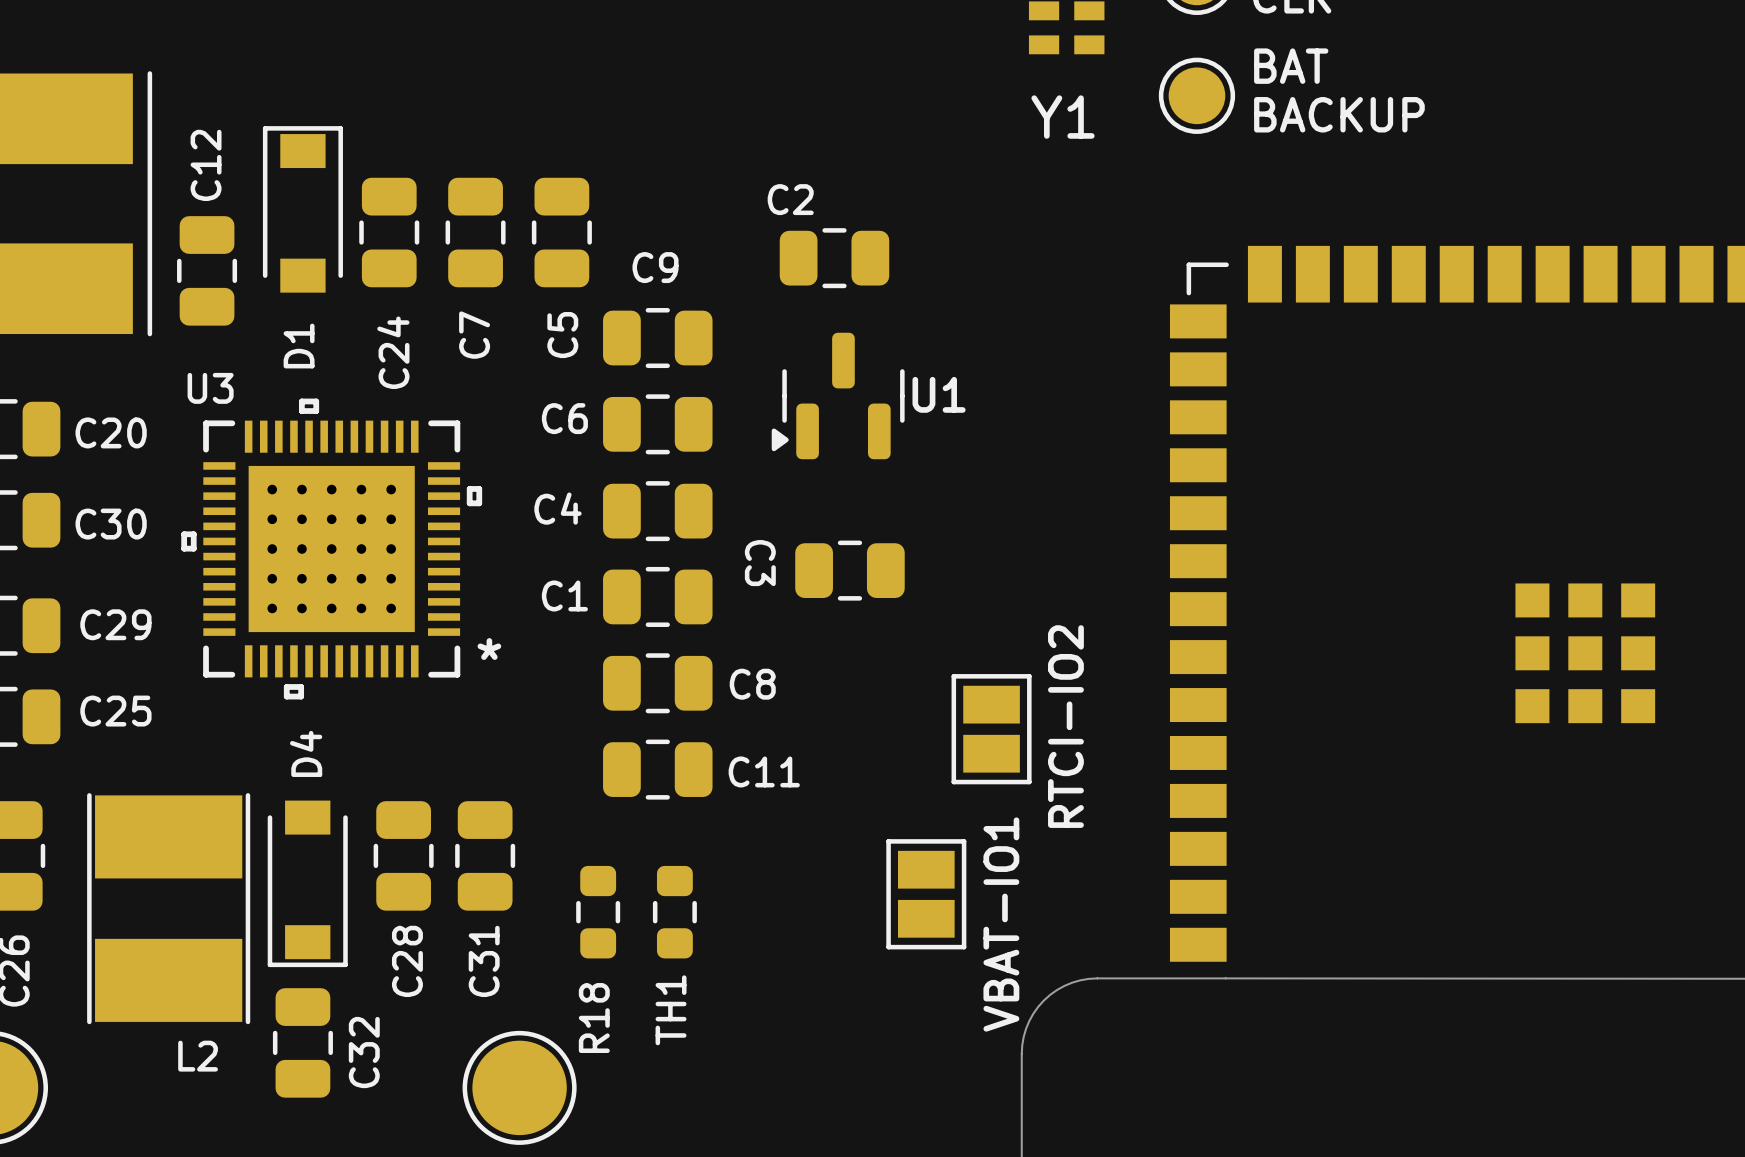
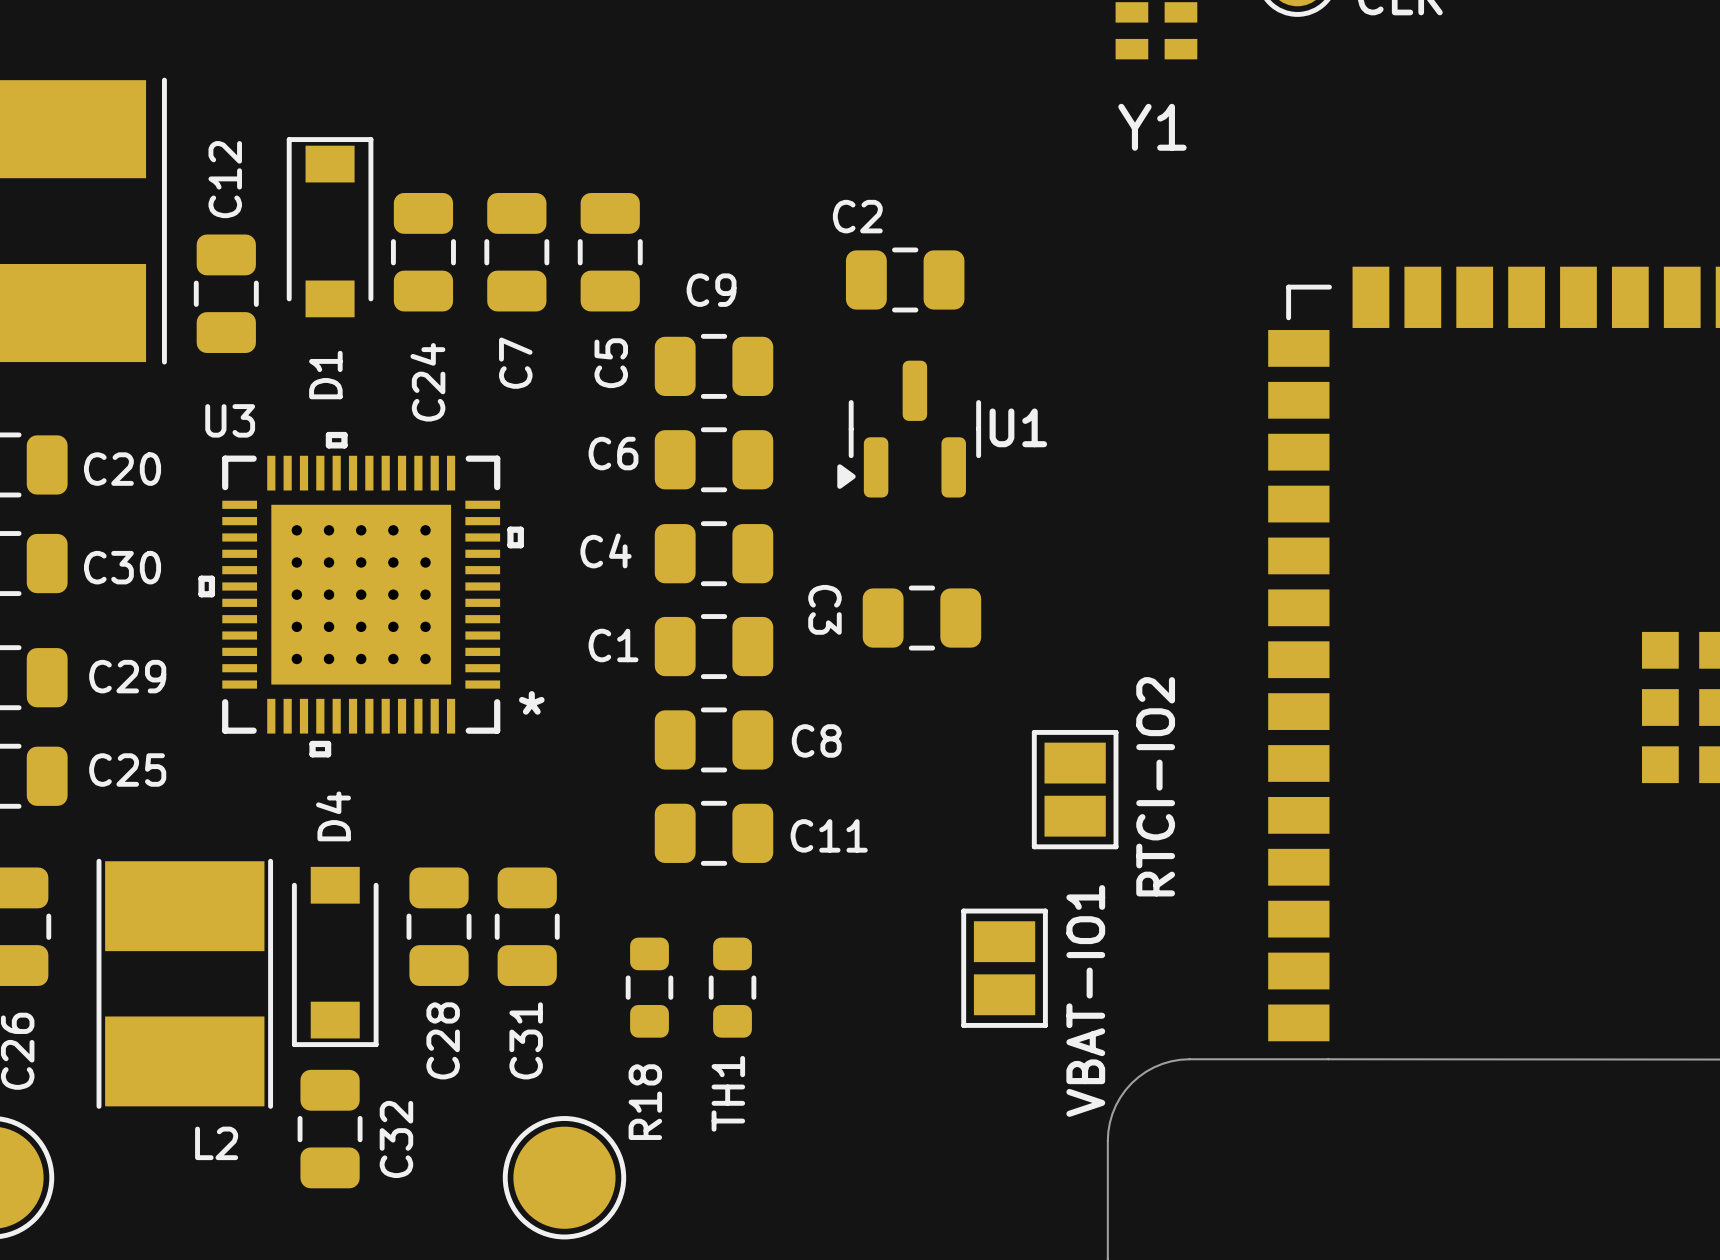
text: BAT (1291, 66) -> none
part: (1196, 95) -> none
text: BACKUP (1339, 114) -> none

